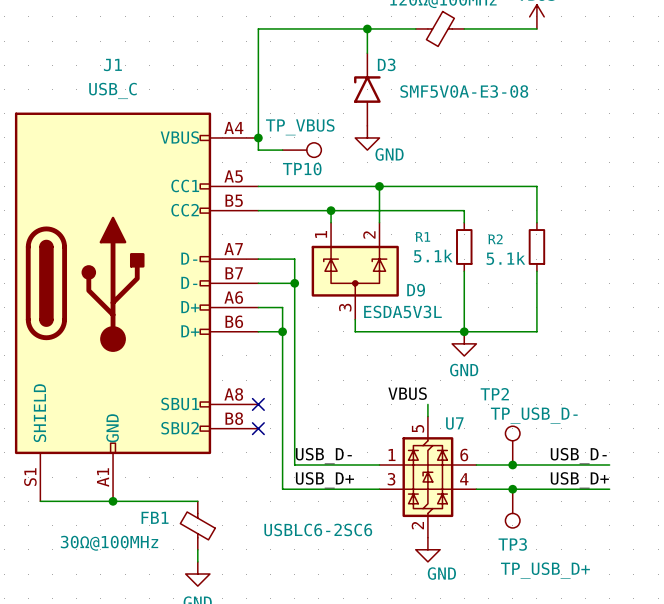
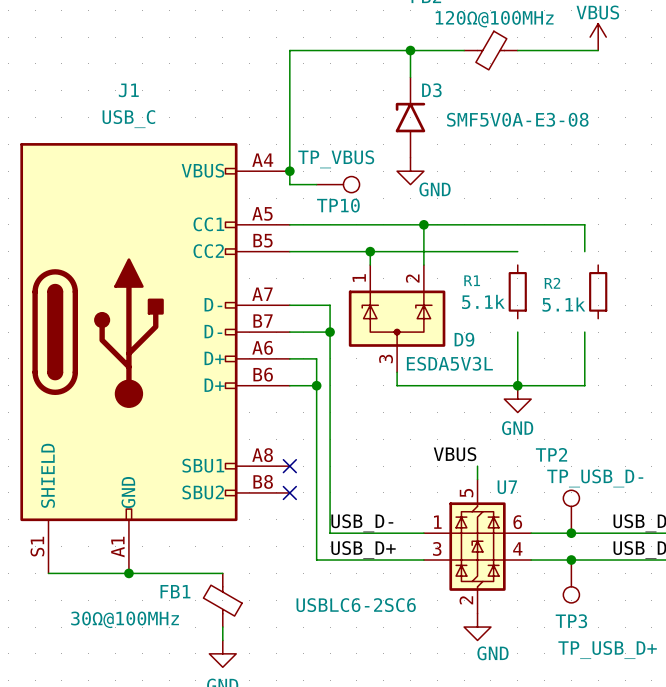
wire: (524, 186) (536, 186) (536, 222) -> (584, 224) (584, 251)
wire: (464, 210) (464, 222) -> none
wire: (464, 271) (464, 283) -> none
wire: (536, 271) (536, 331) (524, 331) -> (584, 332) (584, 385)

